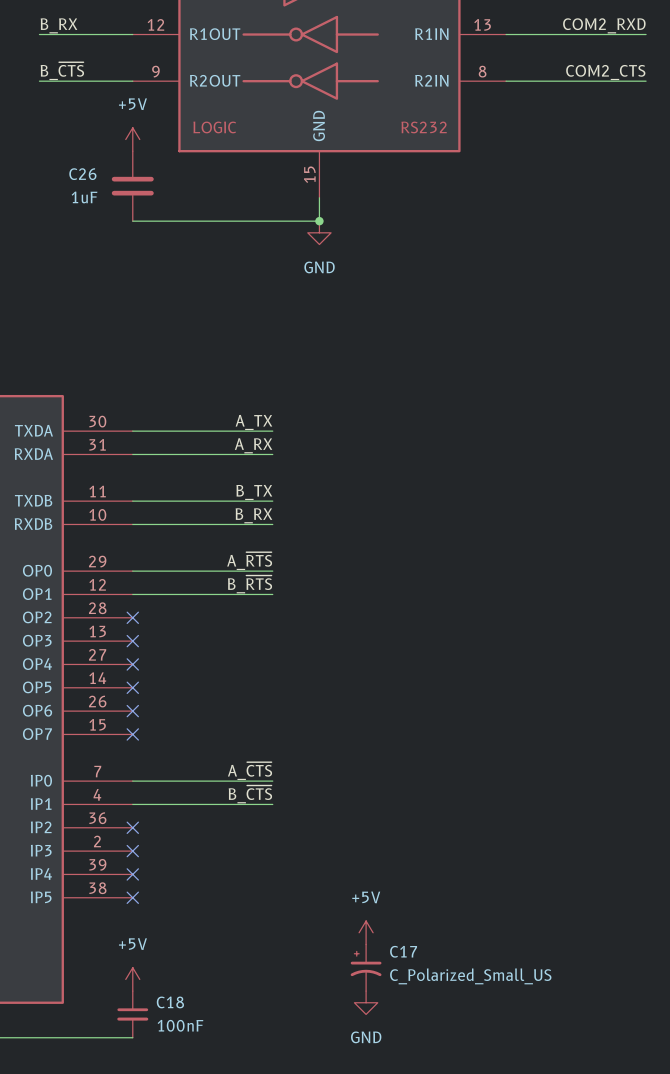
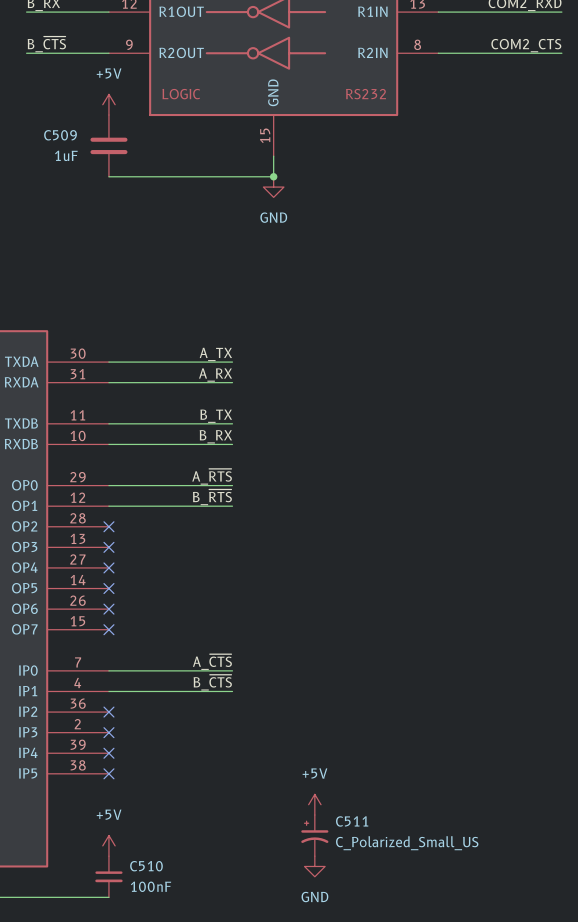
C26 name: C26 (82, 174) -> C509 (60, 135)
C17 name: C17 (403, 951) -> C511 (352, 821)
C18 name: C18 (170, 1002) -> C510 (146, 866)

